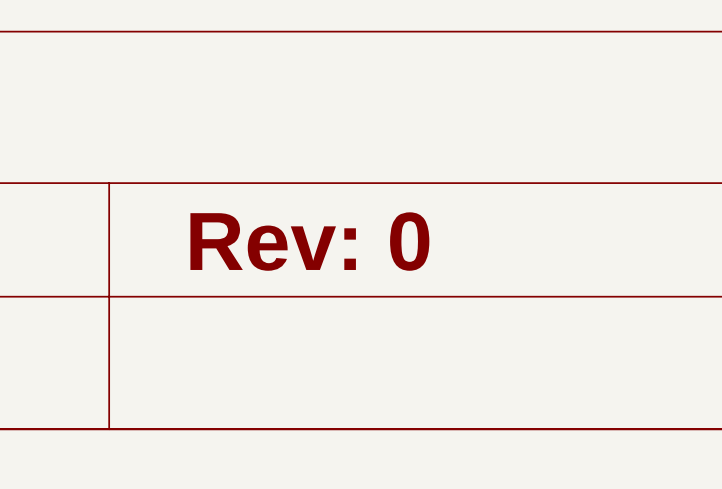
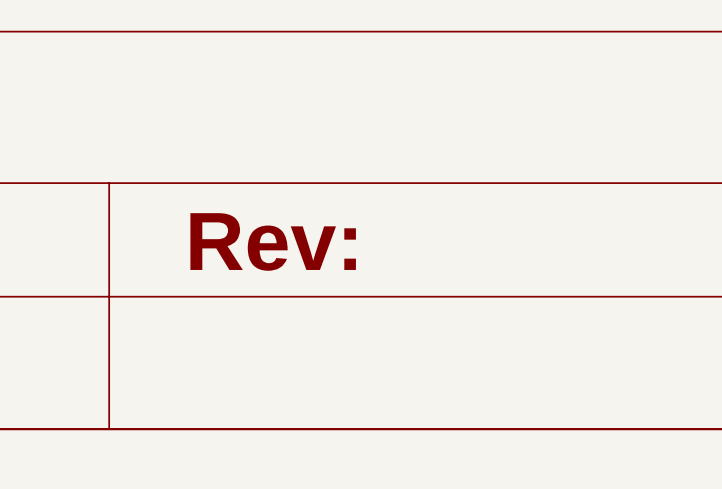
title block: Rev: 0 (309, 241) -> Rev: (273, 241)

